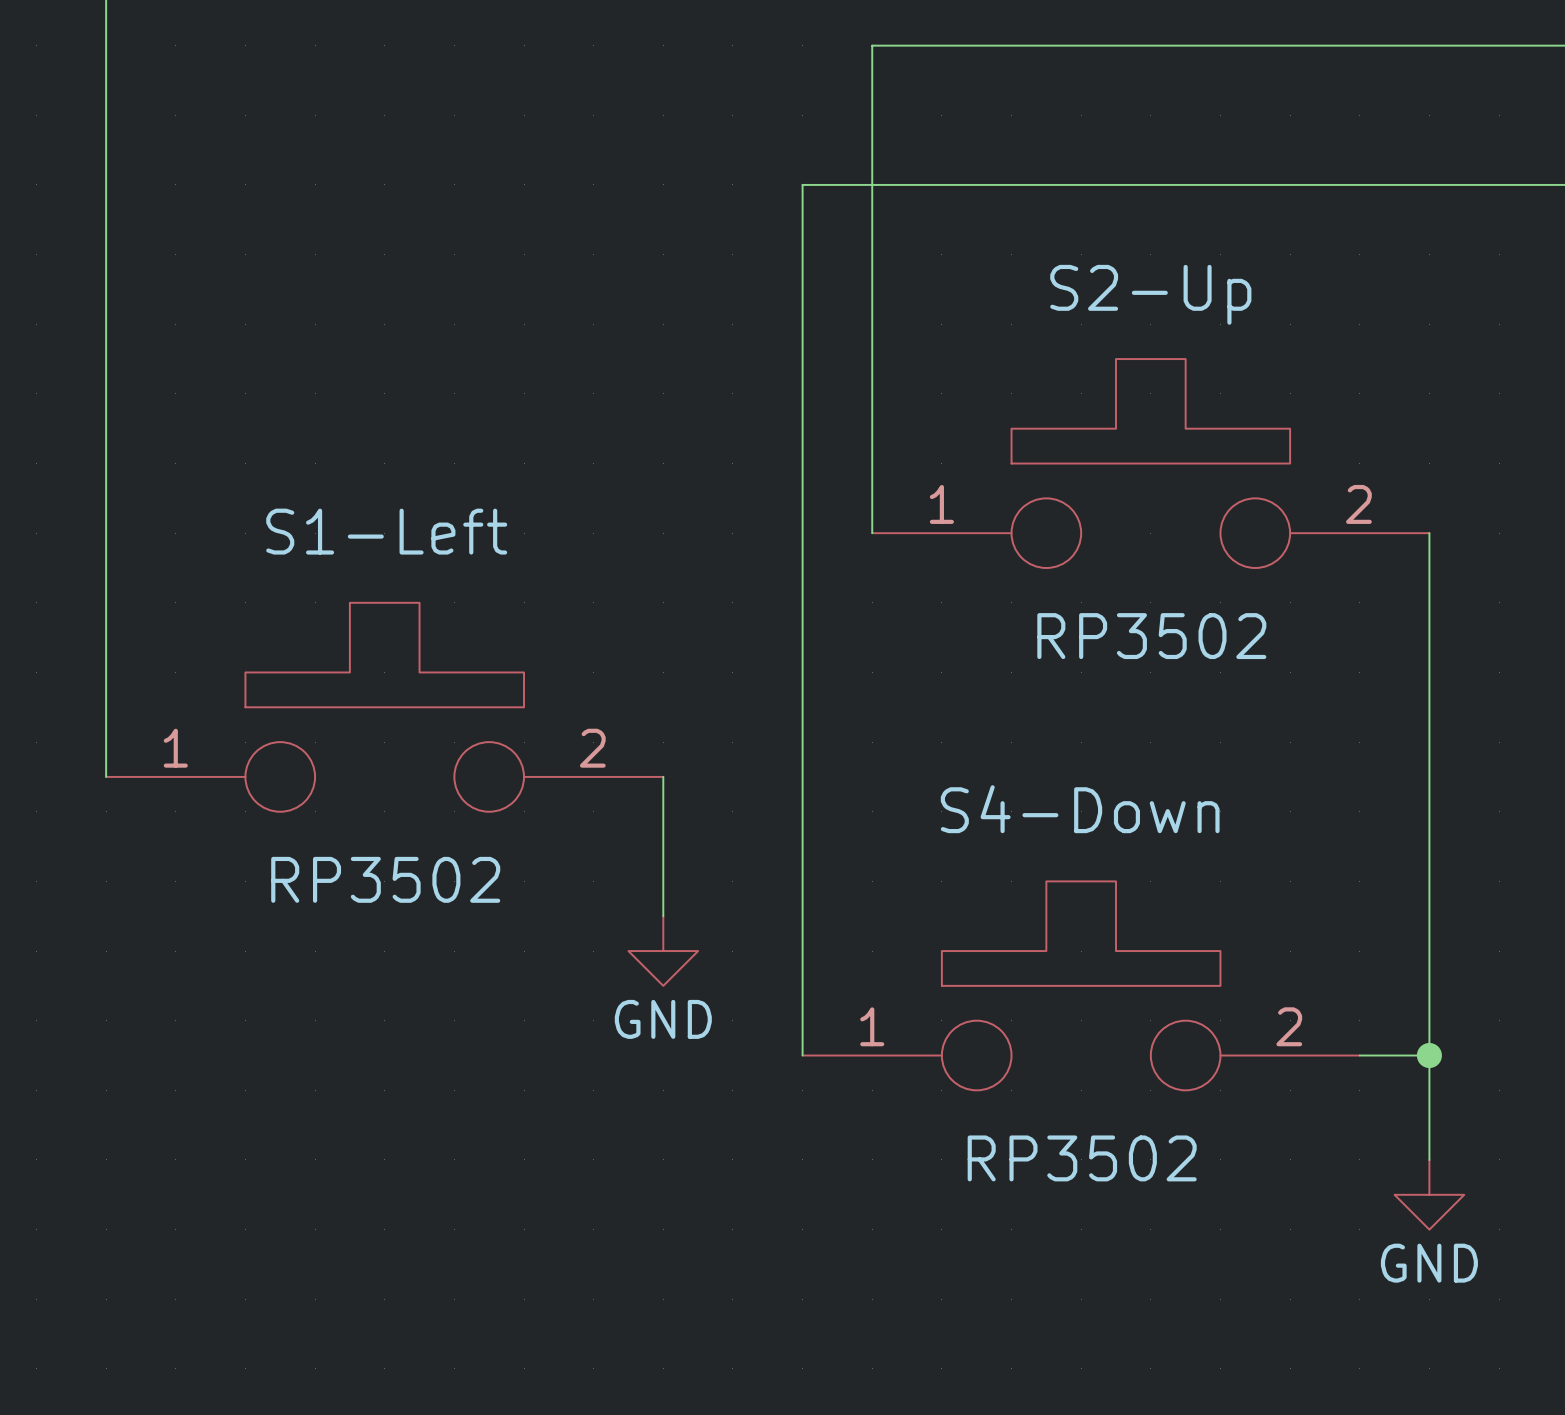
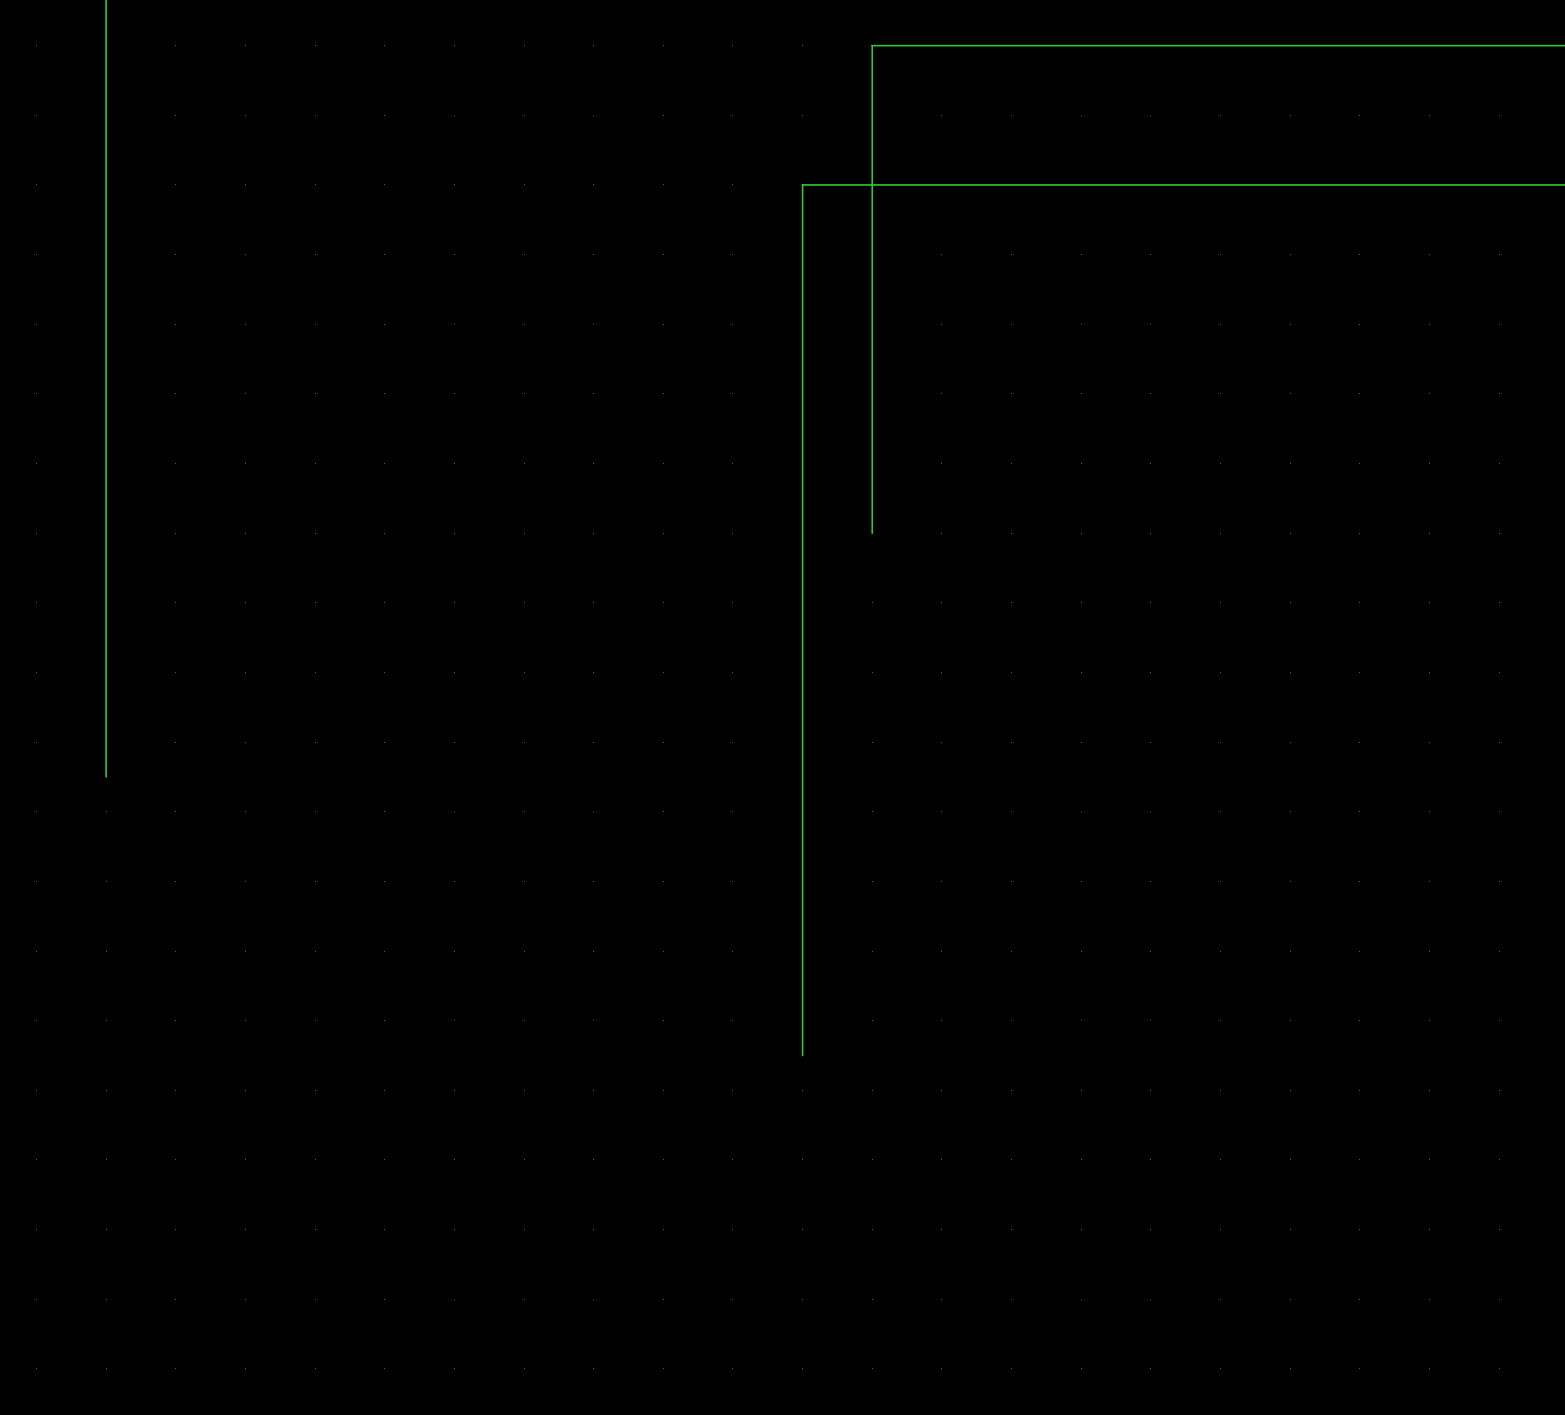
S2-Up: RP3502 (1150, 463) -> none
wire: (1429, 533) (1429, 1159) -> none
S1-Left: RP3502 (384, 707) -> none
wire: (663, 776) (663, 916) -> none
power symbol: GND (663, 951) -> none
S4-Down: RP3502 (1081, 985) -> none
wire: (1359, 1055) (1429, 1055) -> none
junction: (1429, 1055) -> none
power symbol: GND (1429, 1194) -> none

